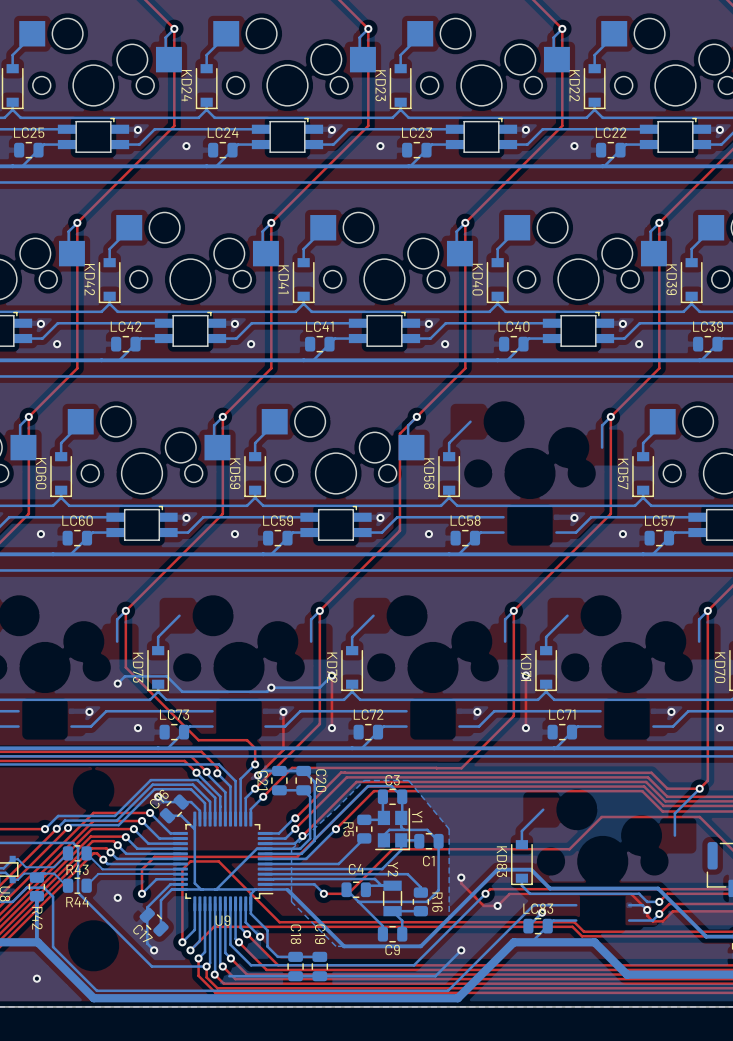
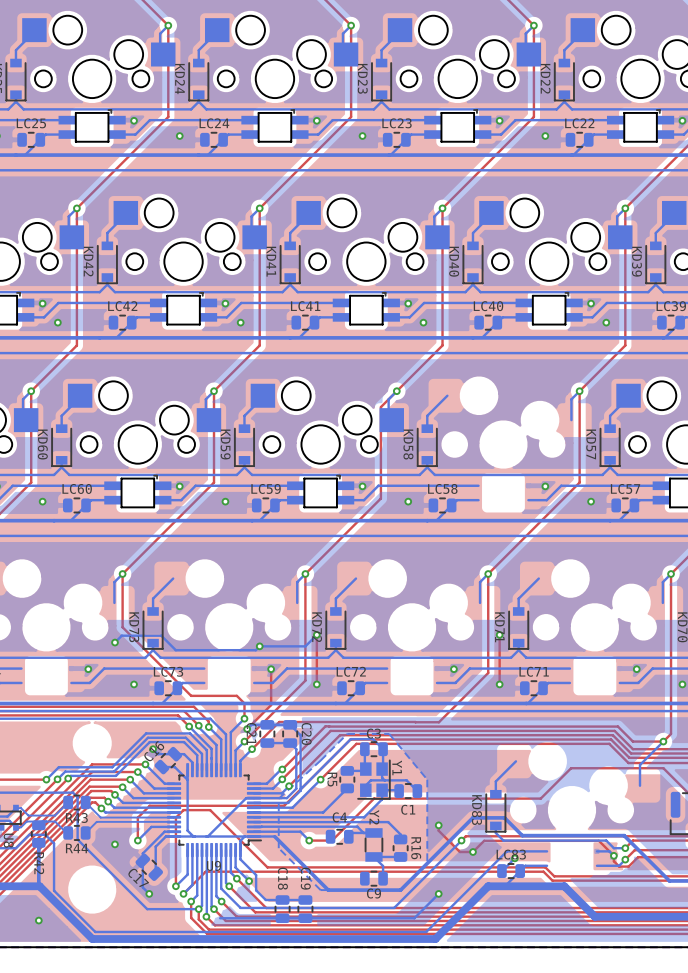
bottom track: (438, 841) (438, 890) (427, 901) (358, 901) -> none
bottom track: (346, 889) (382, 926) (382, 934) -> none

